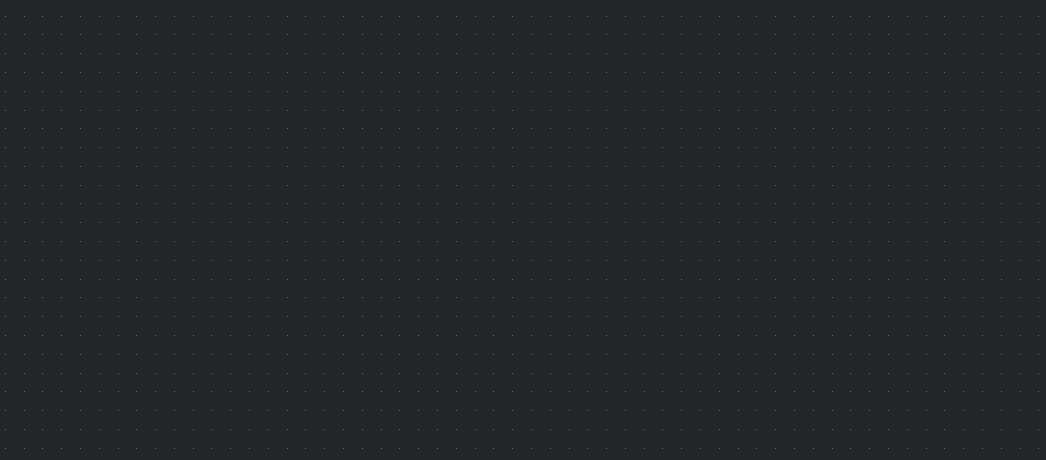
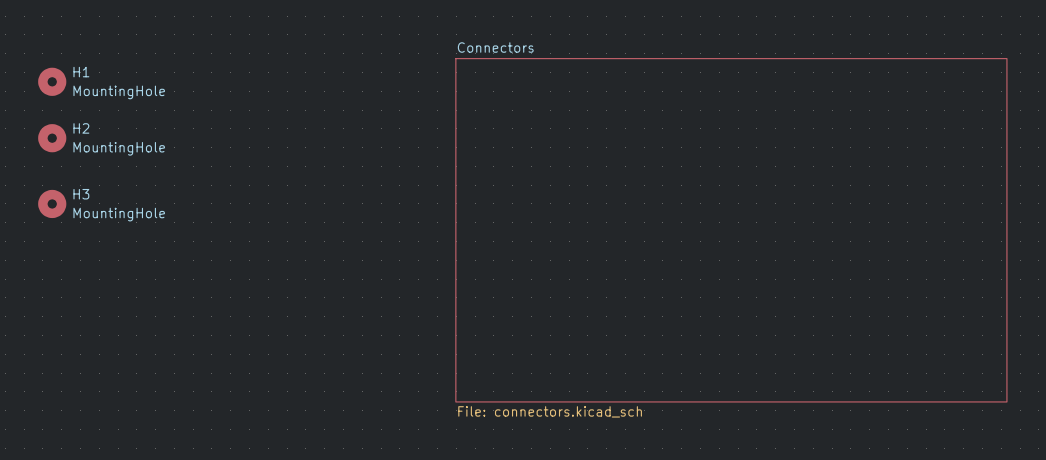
H1: none -> MountingHole (52, 81)
H2: none -> MountingHole (52, 138)
H3: none -> MountingHole (52, 203)
sheet Connectors: none -> File: connectors.kicad_sch (731, 230)

